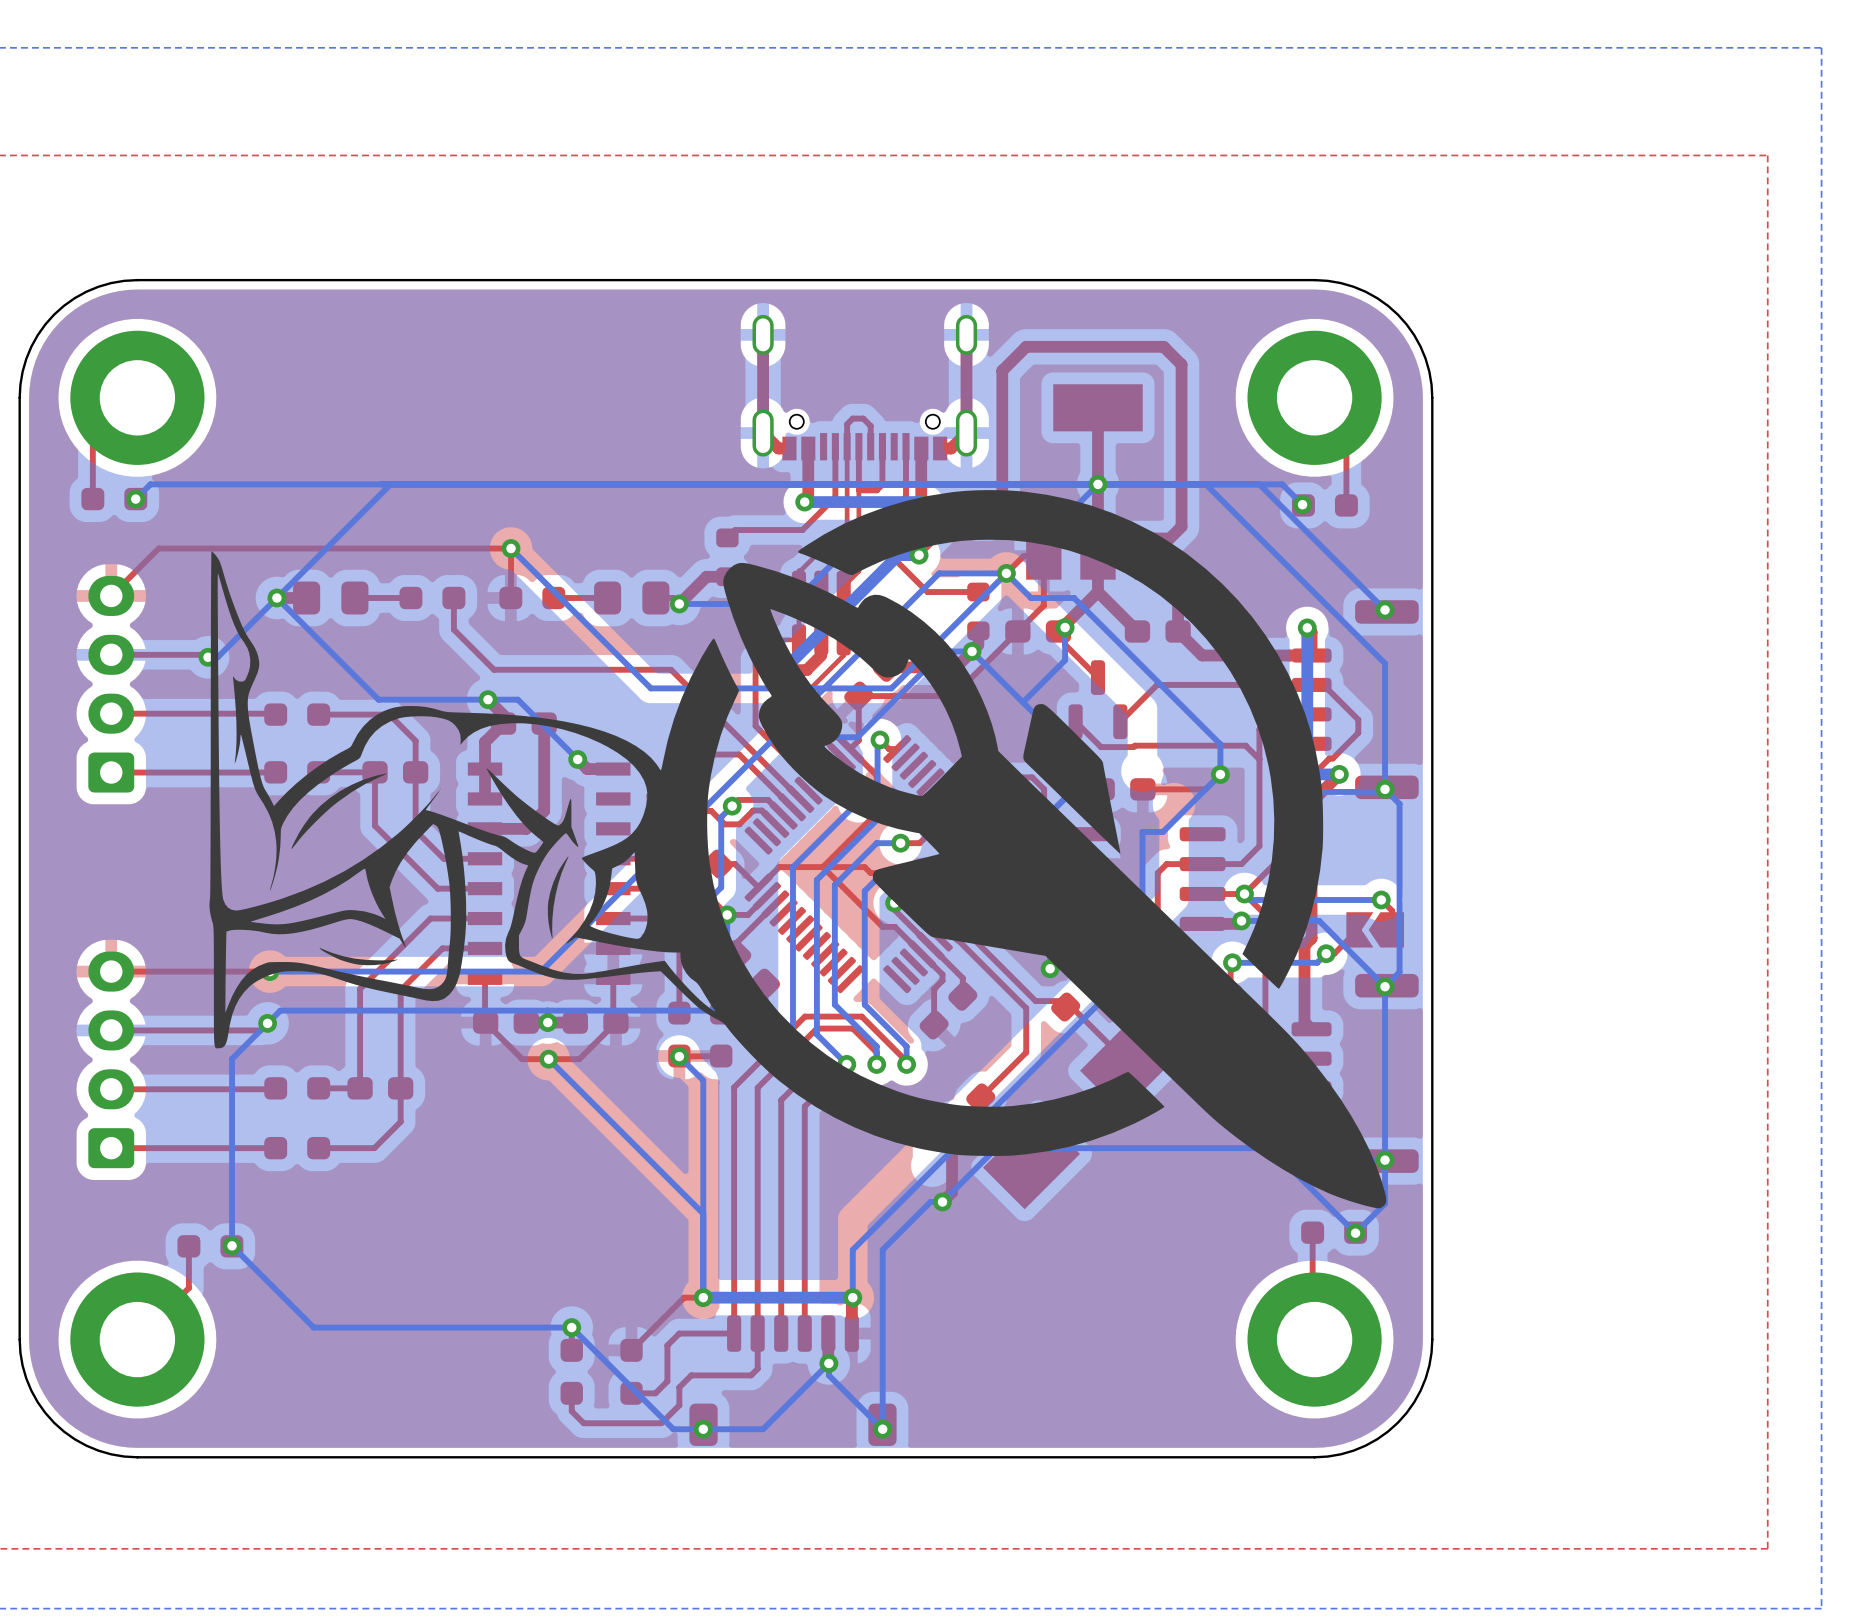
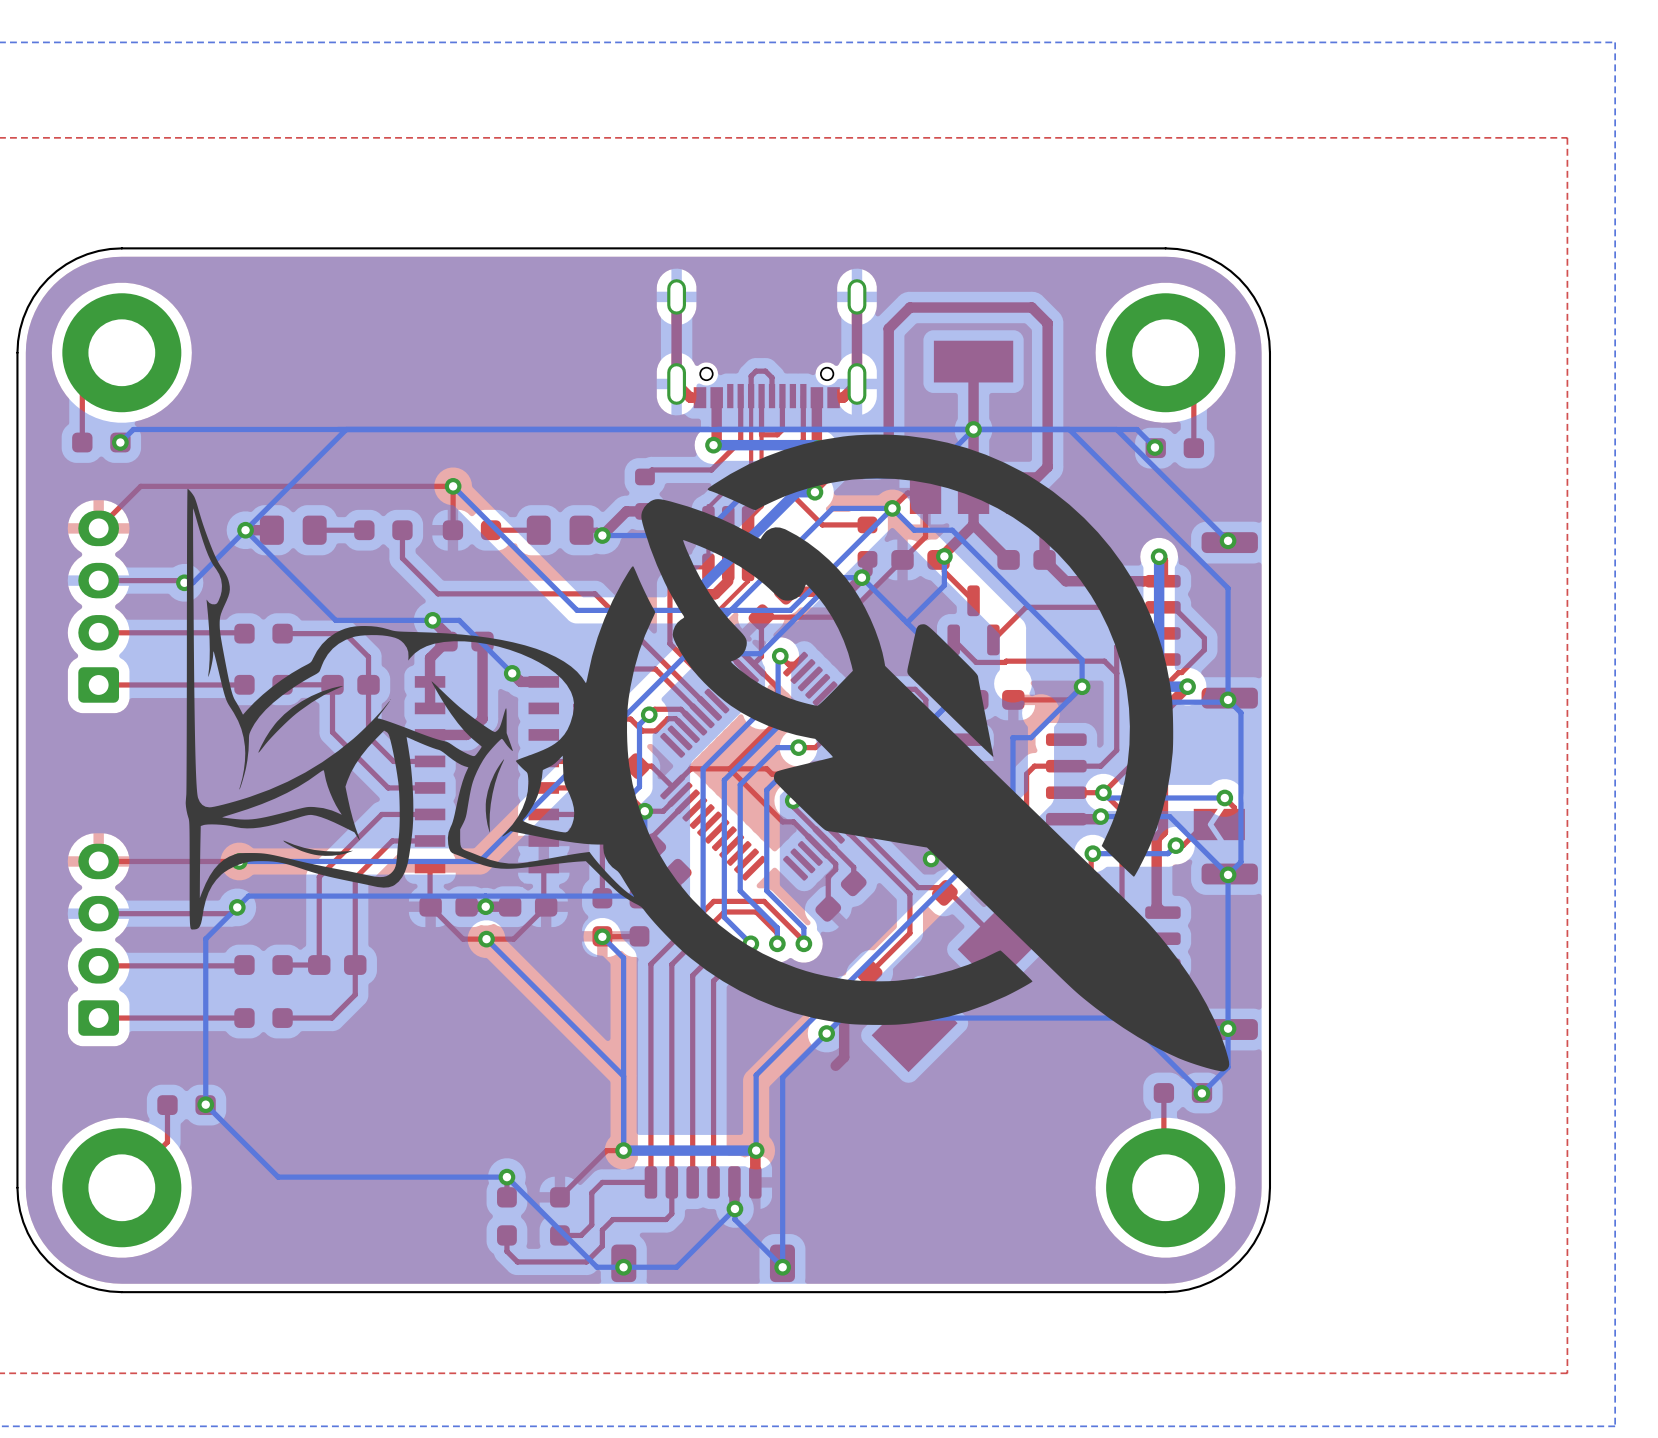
bottom track: (1142, 922) (1142, 960) (852, 1249) -> (1013, 818) (756, 1075) (756, 1108)
bottom track: (996, 1148) (942, 1201) (930, 1201) (882, 1249) -> (883, 1018) (842, 1018) (782, 1077) (782, 1108)
via position: (942, 1201) -> (826, 1033)

